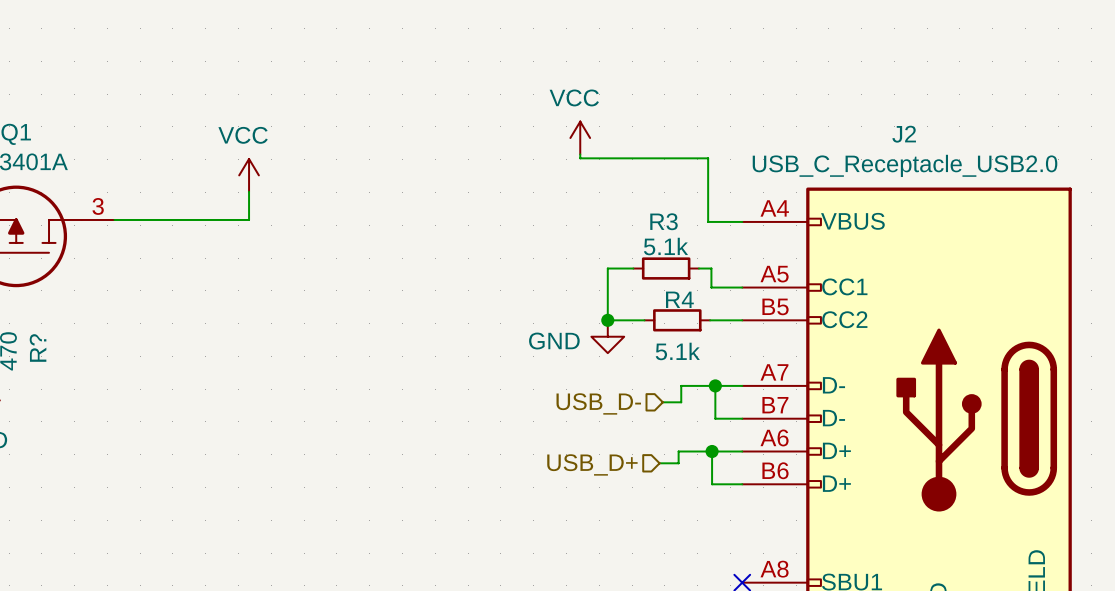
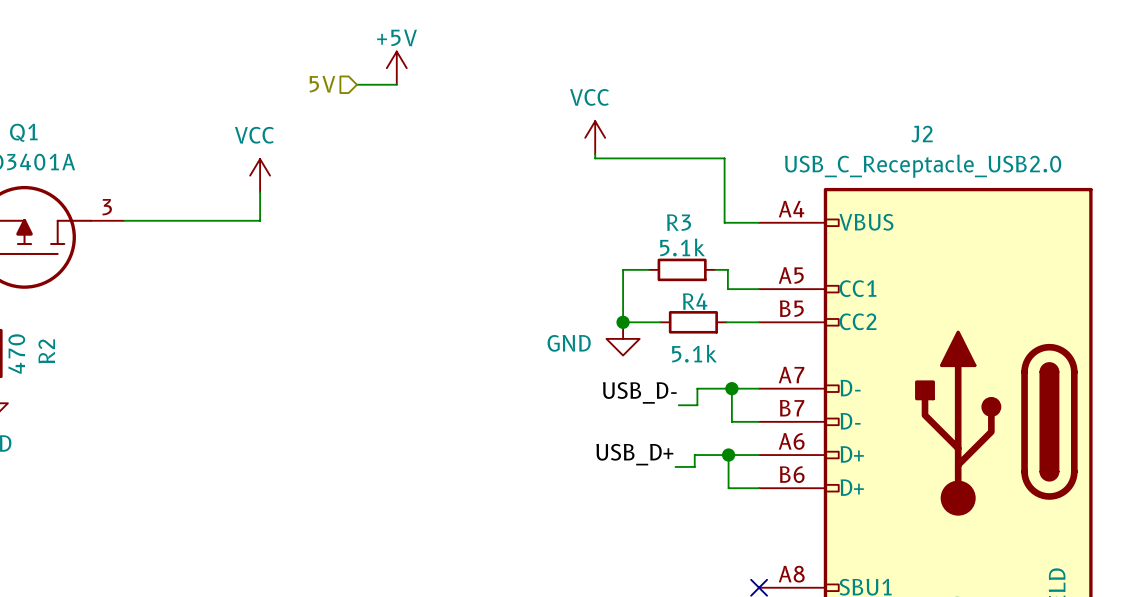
power symbol: none -> +5V (396, 68)
hierarchical label: none -> 5V (322, 84)
wire: none -> (356, 84) (396, 84)
R? name: R? (38, 348) -> R2 (46, 351)
label: none -> USB_D- (639, 392)
hierarchical label: USB_D- (598, 403) -> none
label: none -> USB_D+ (634, 454)
hierarchical label: USB_D+ (592, 464) -> none

